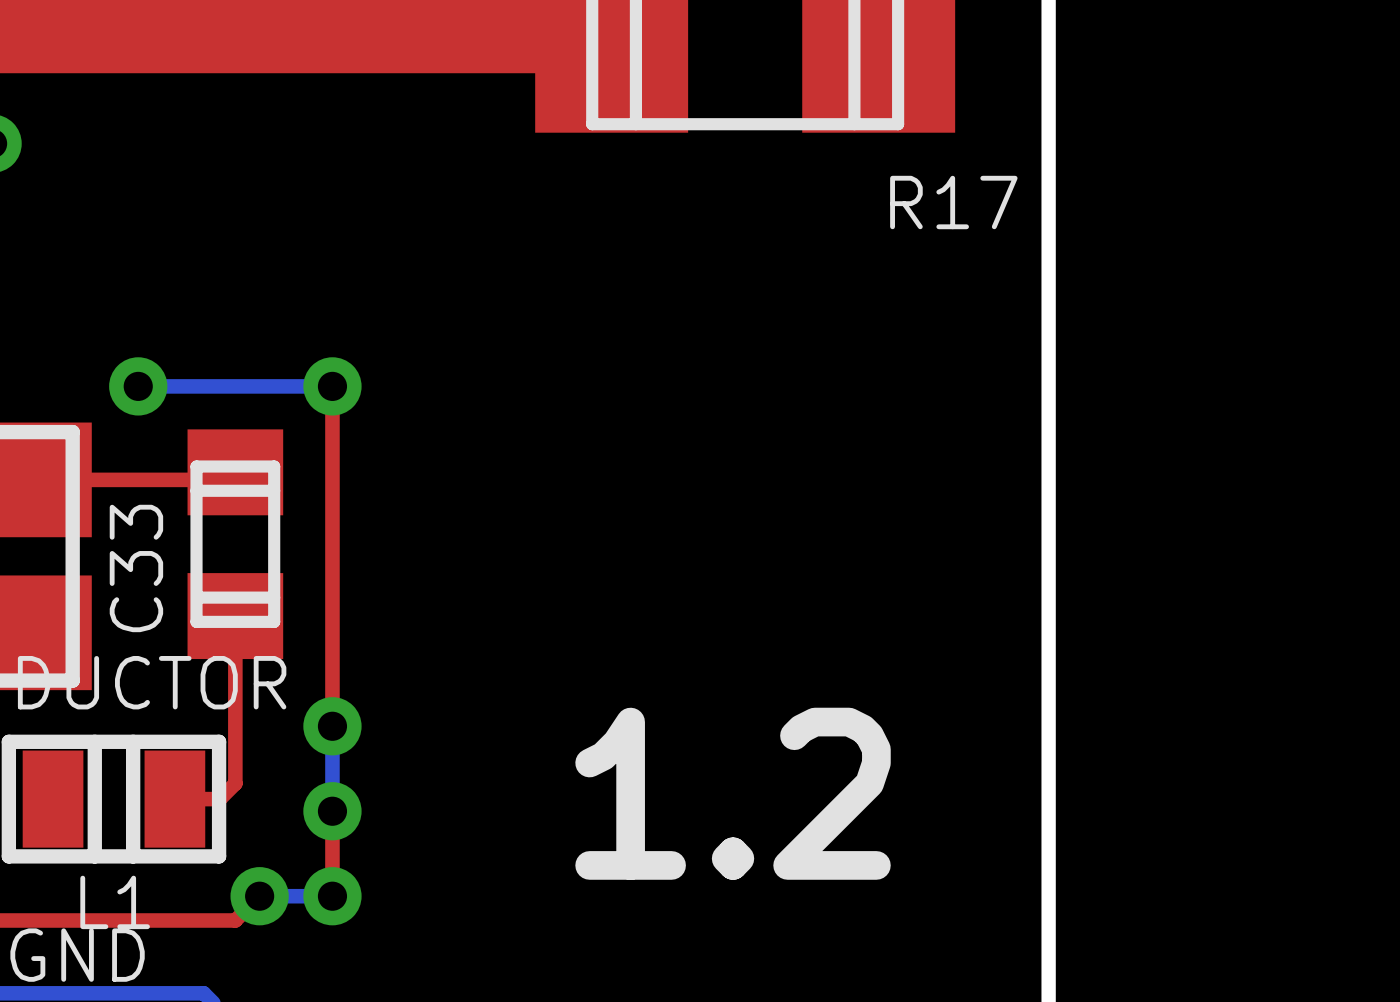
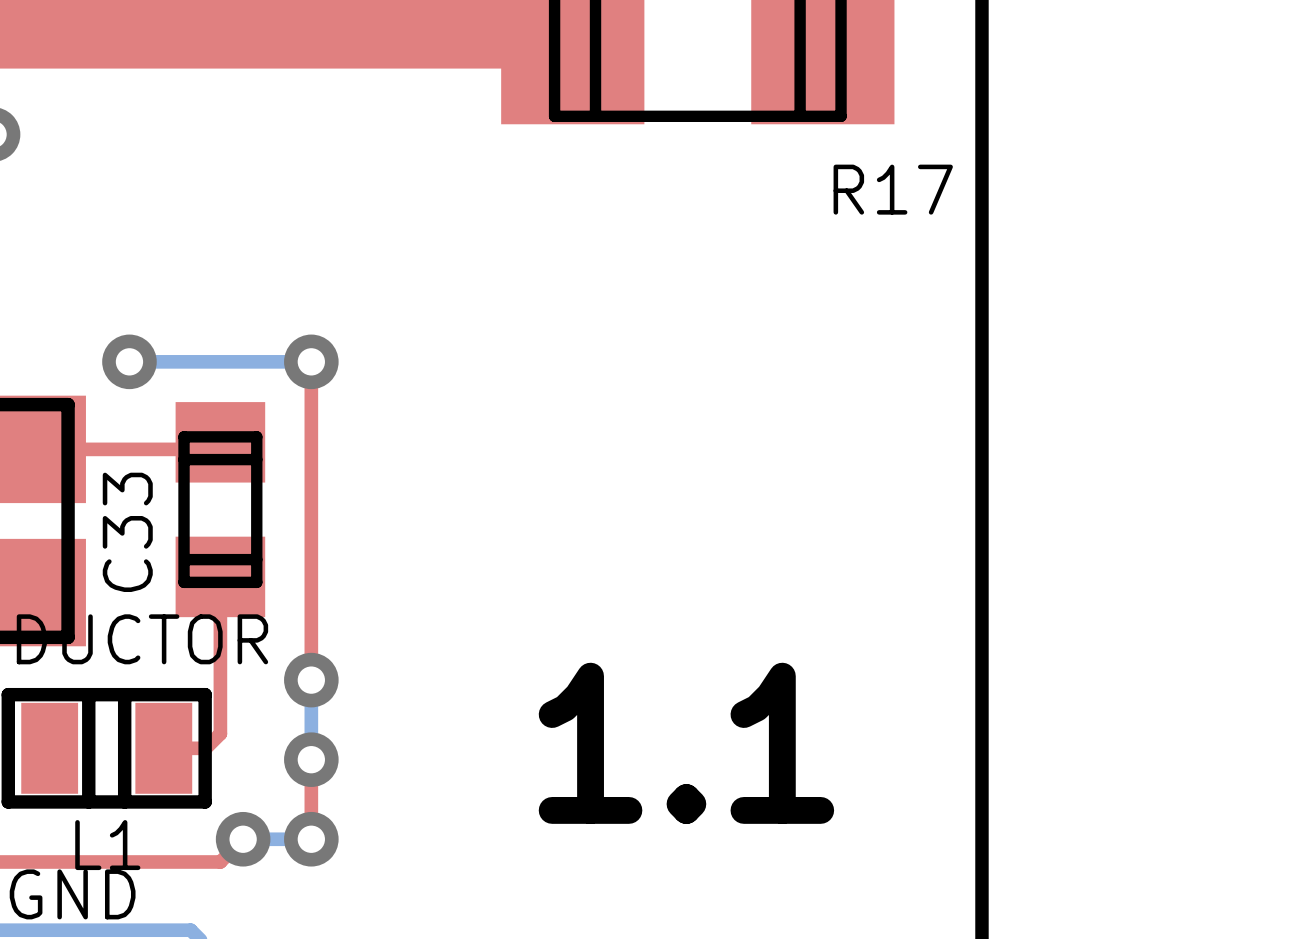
text: 1.2 (733, 793) -> 1.1 (686, 743)

